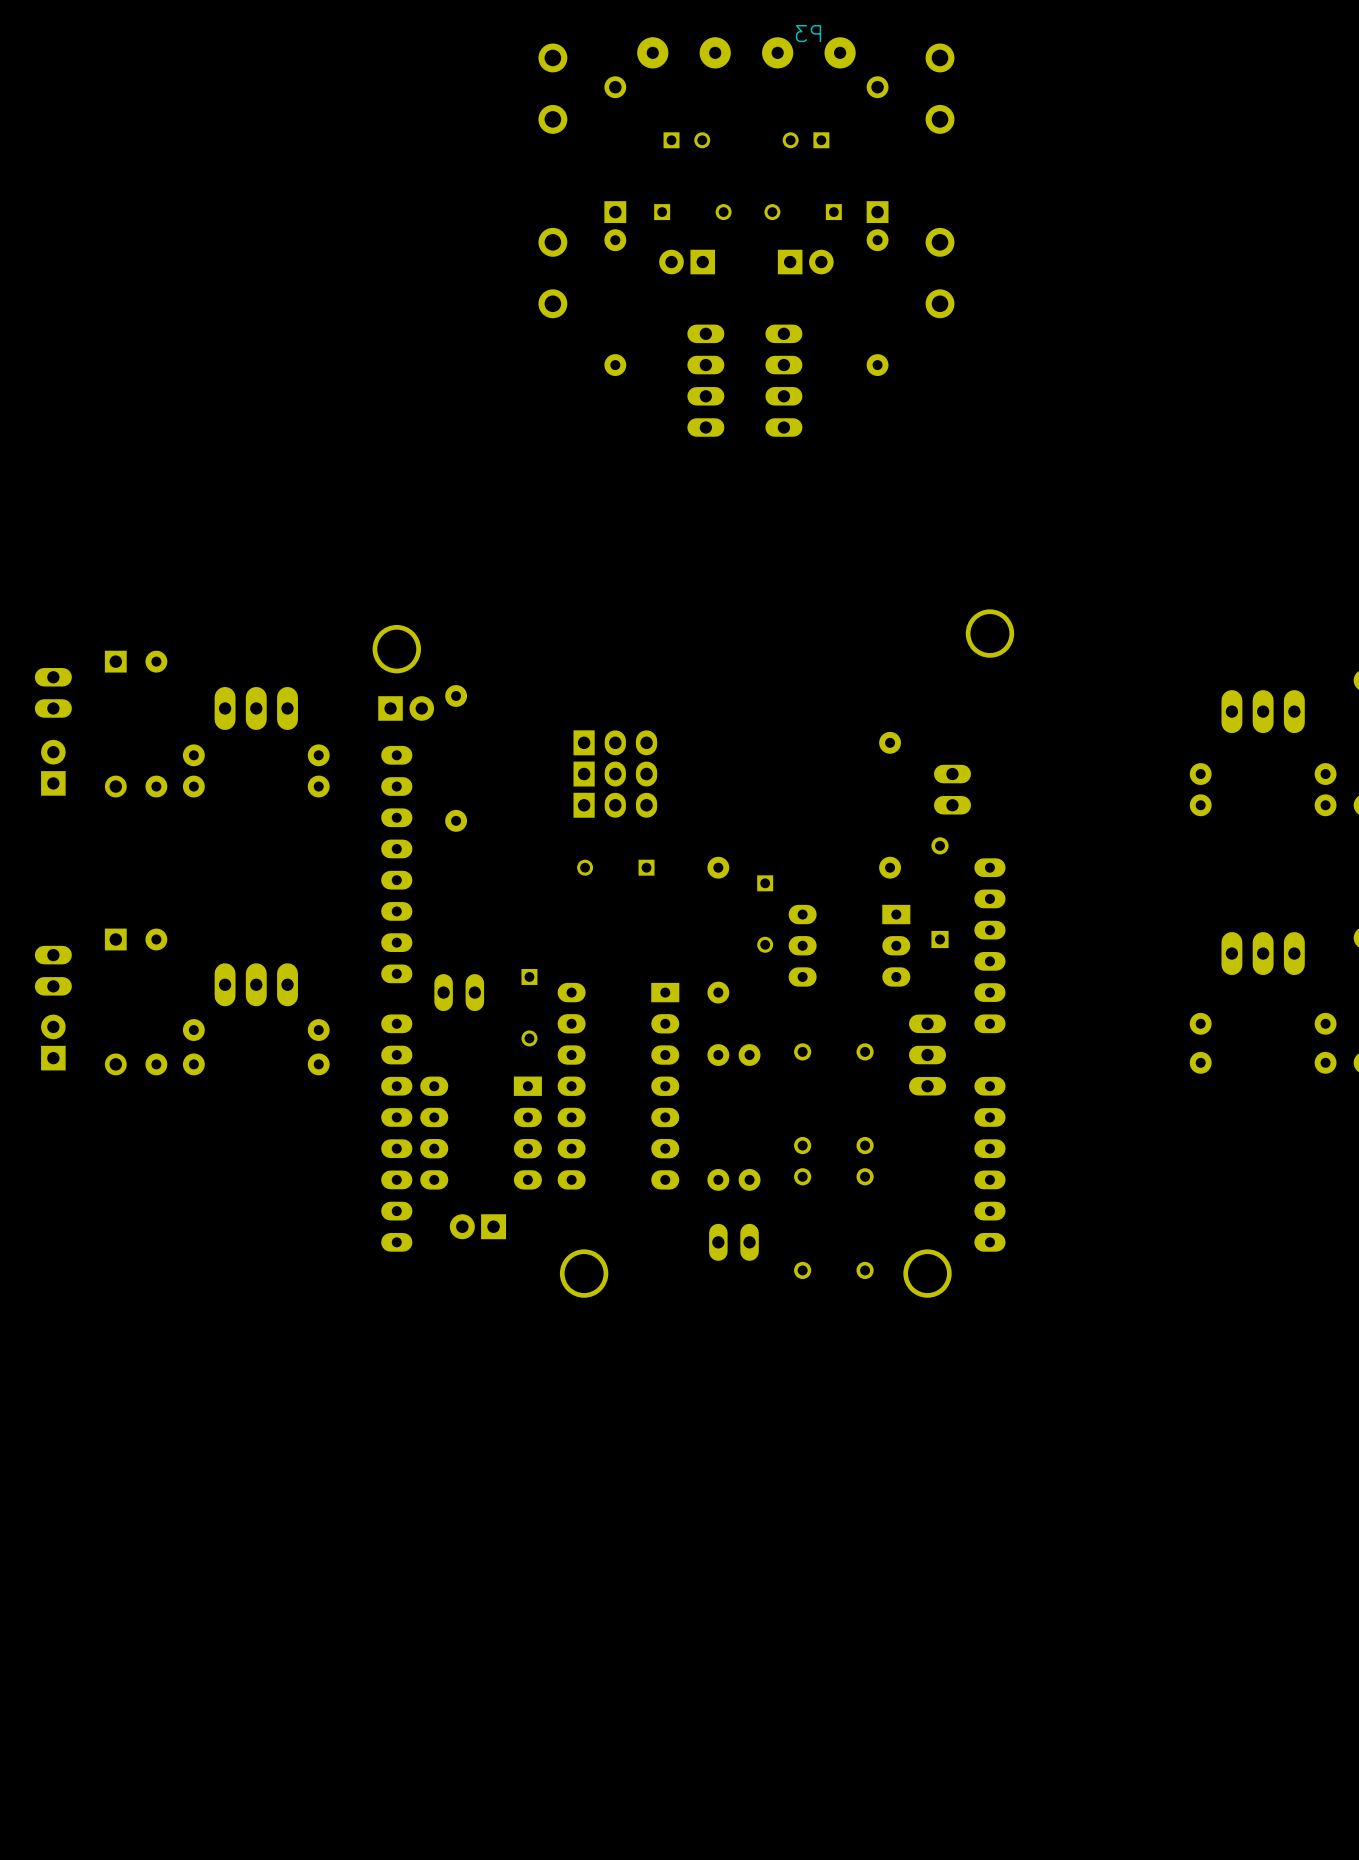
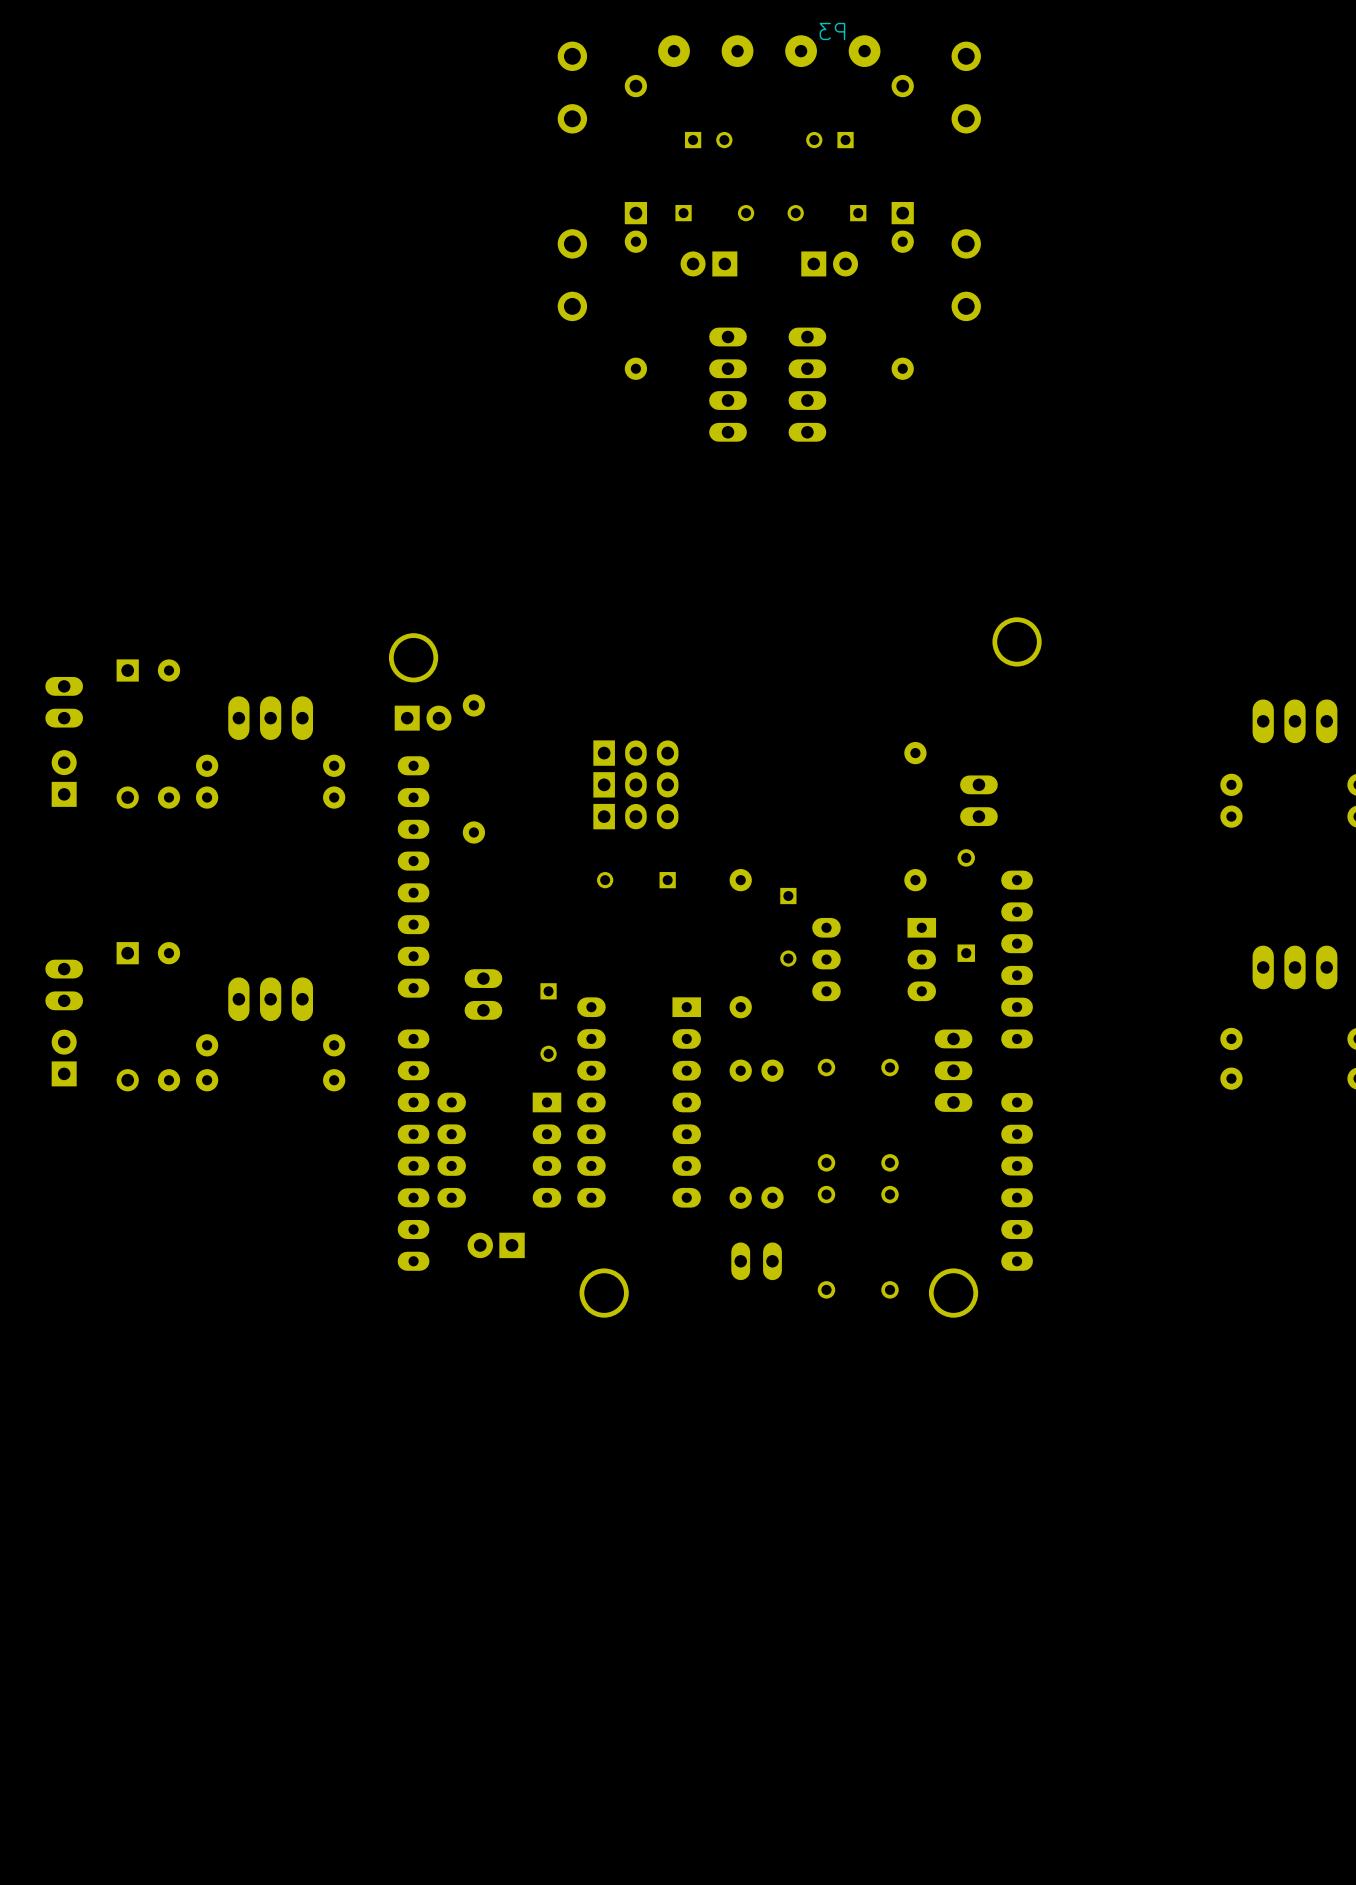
part rotation: 0° (459, 992) -> 90° clockwise (483, 994)

